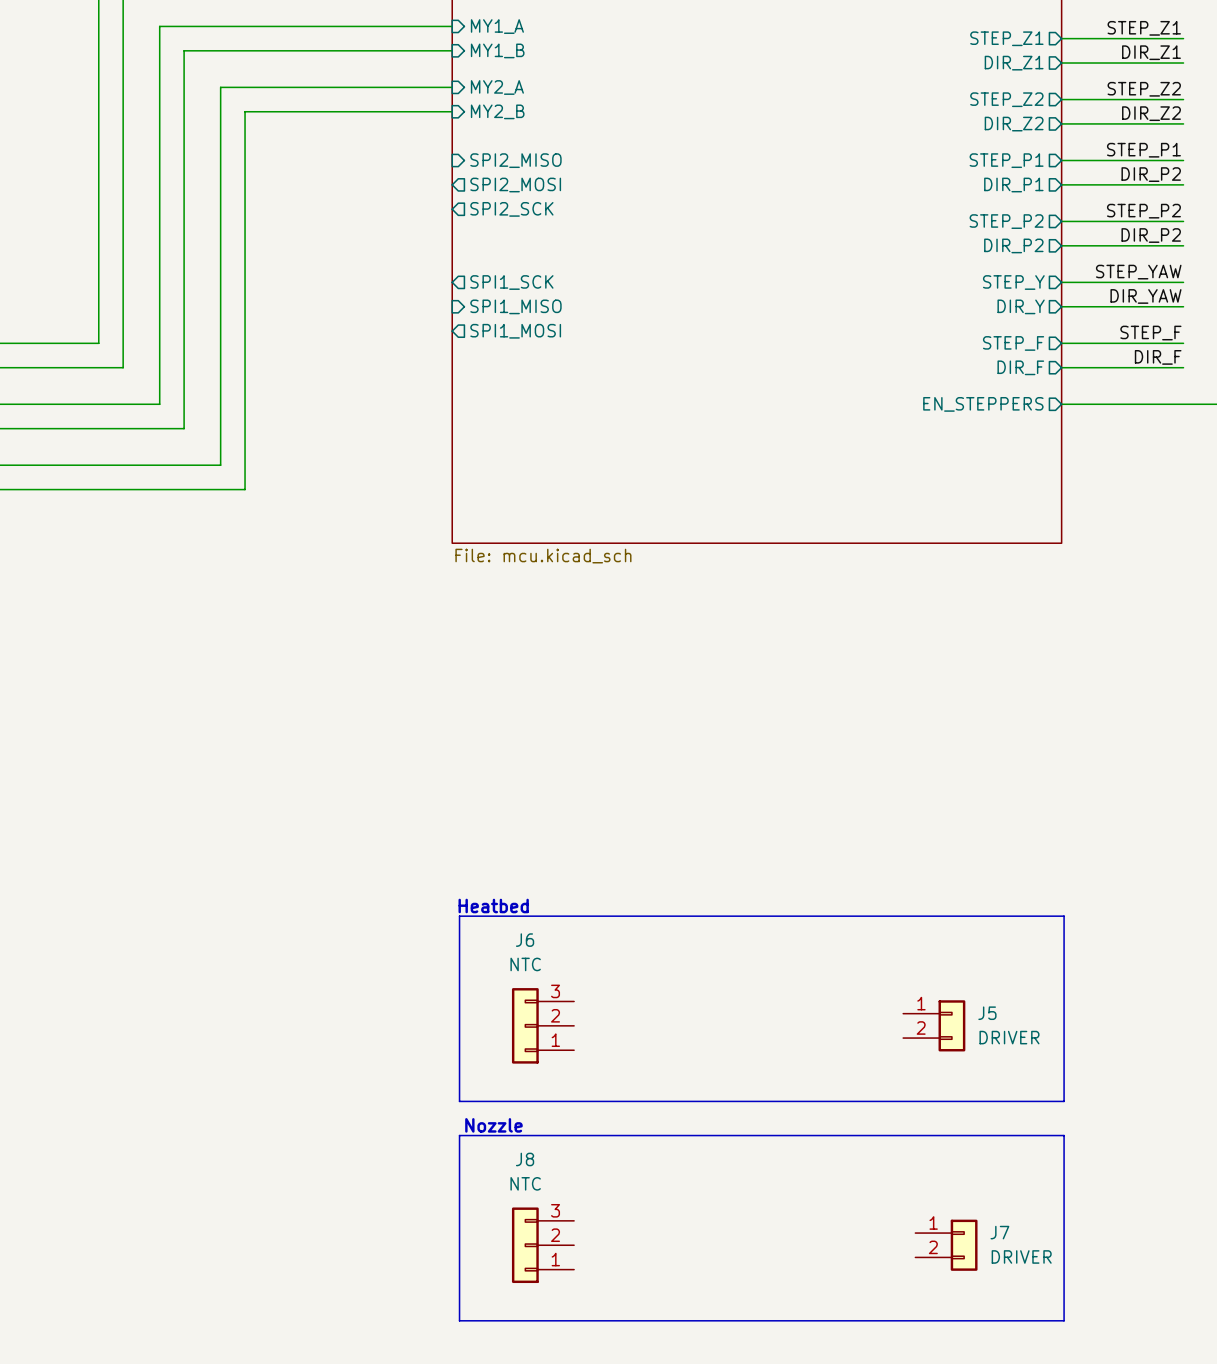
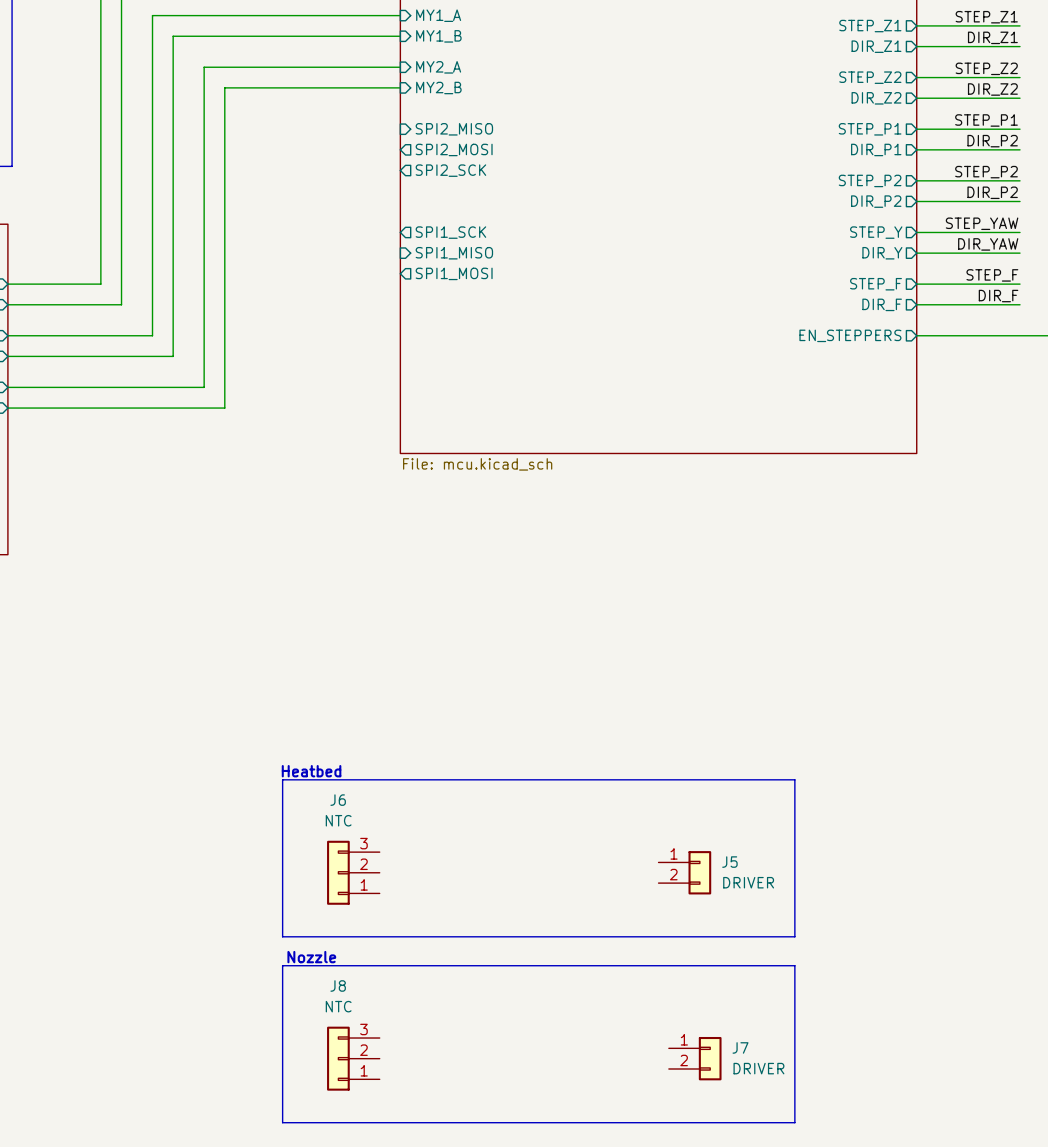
text position: Heatbed (493, 905) -> Heatbed (311, 771)
line: (459, 916) (459, 1101) (1064, 1101) (1064, 916) (459, 916) -> (282, 779) (282, 936) (794, 936) (794, 779) (282, 779)
J6 position: (543, 1025) -> (353, 872)
J5 position: (934, 1025) -> (684, 872)
text position: Nozzle (493, 1125) -> Nozzle (311, 957)
line: (459, 1135) (1064, 1135) (1064, 1320) (459, 1320) (459, 1135) -> (282, 965) (794, 965) (794, 1122) (282, 1122) (282, 965)
J8 position: (543, 1245) -> (353, 1058)
J7 position: (946, 1245) -> (695, 1058)

